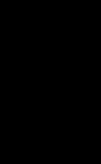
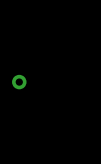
via: none -> (19, 82)

